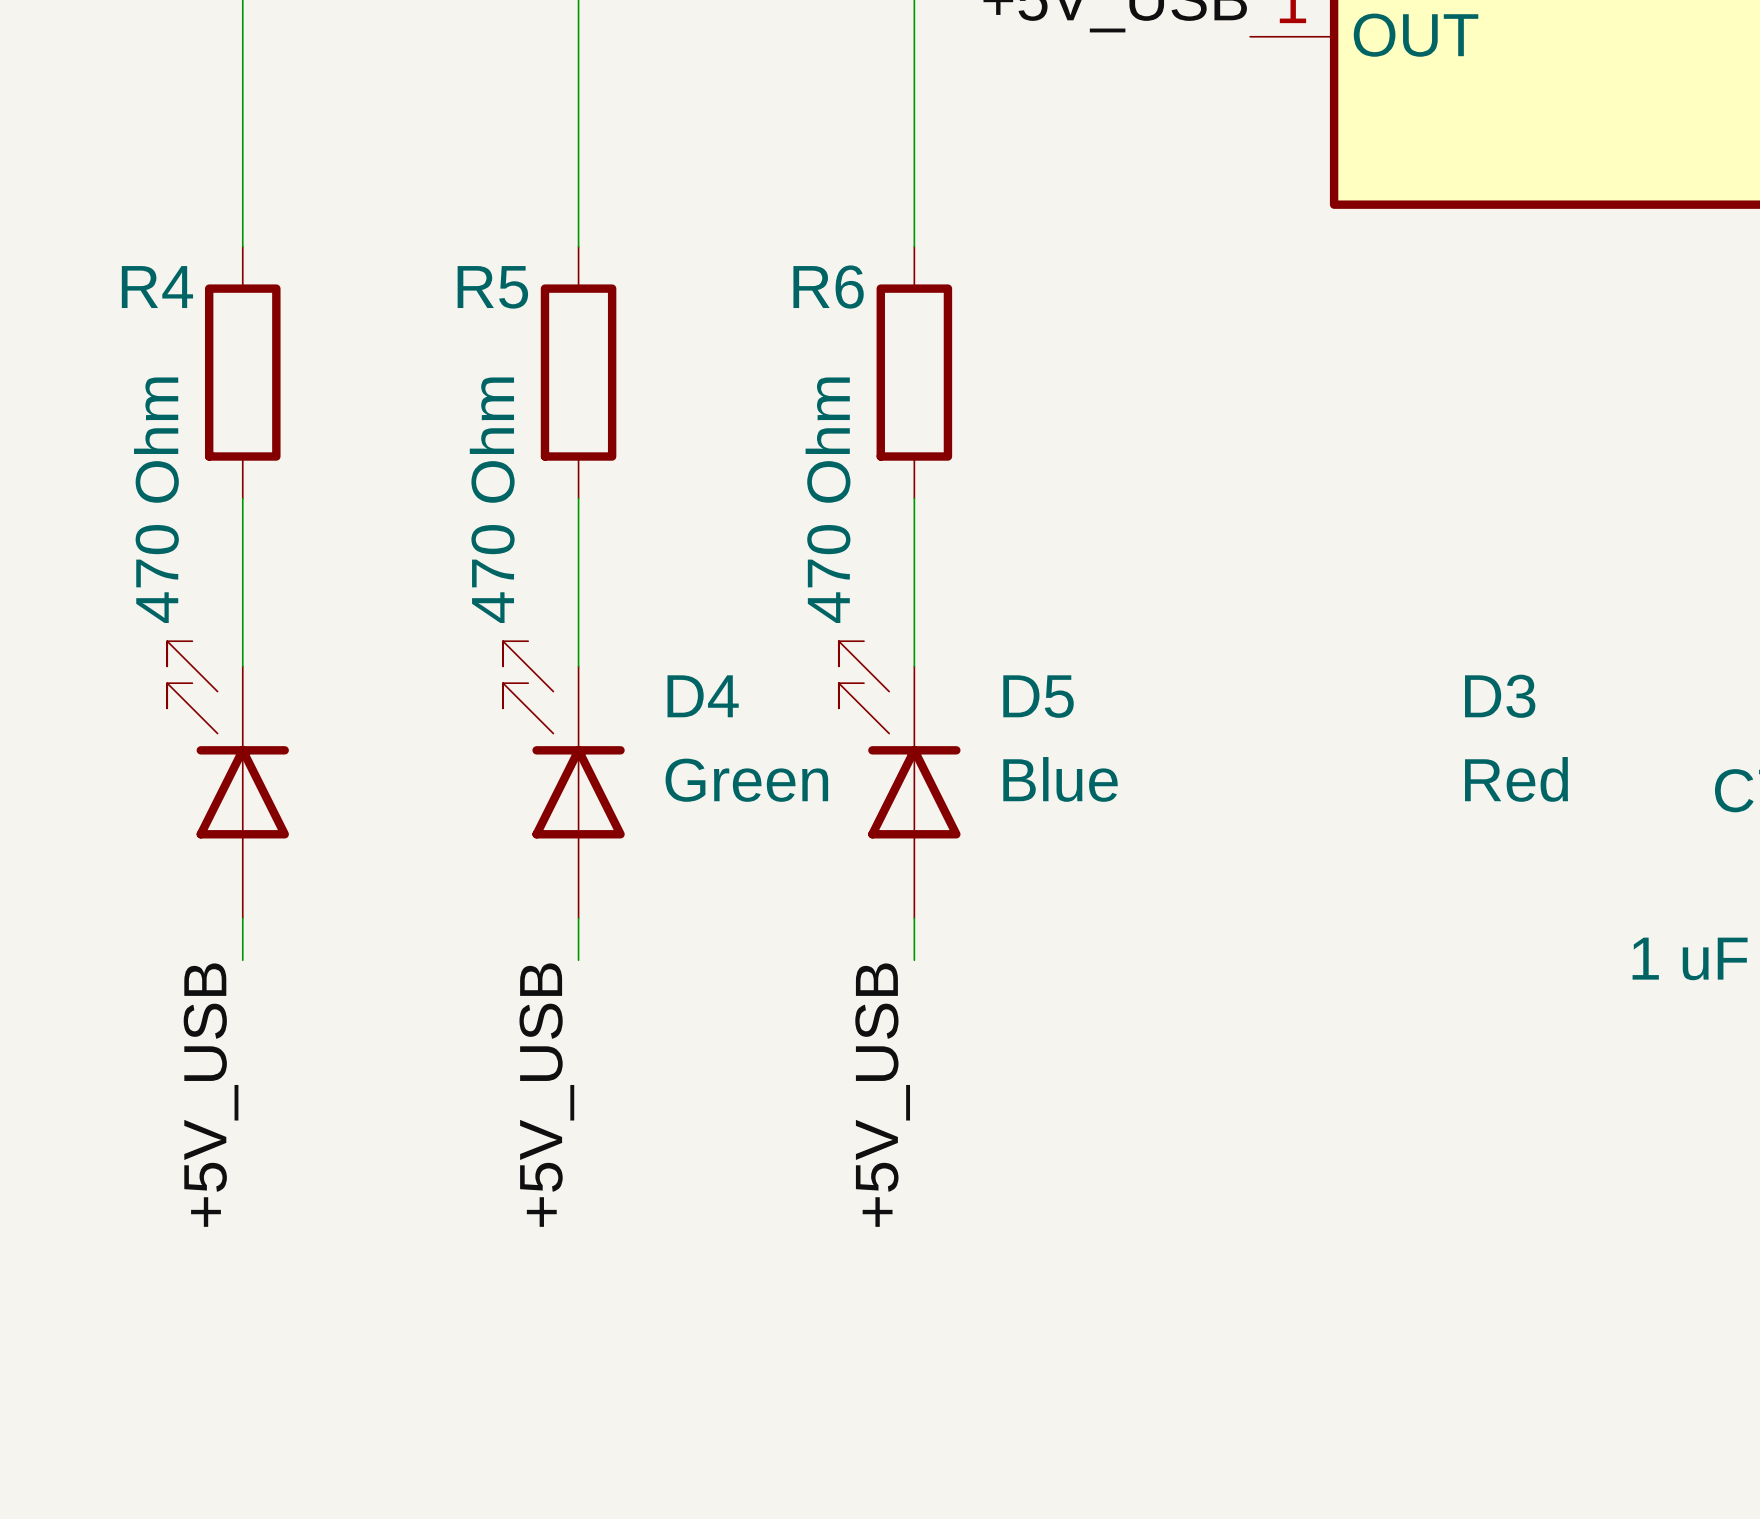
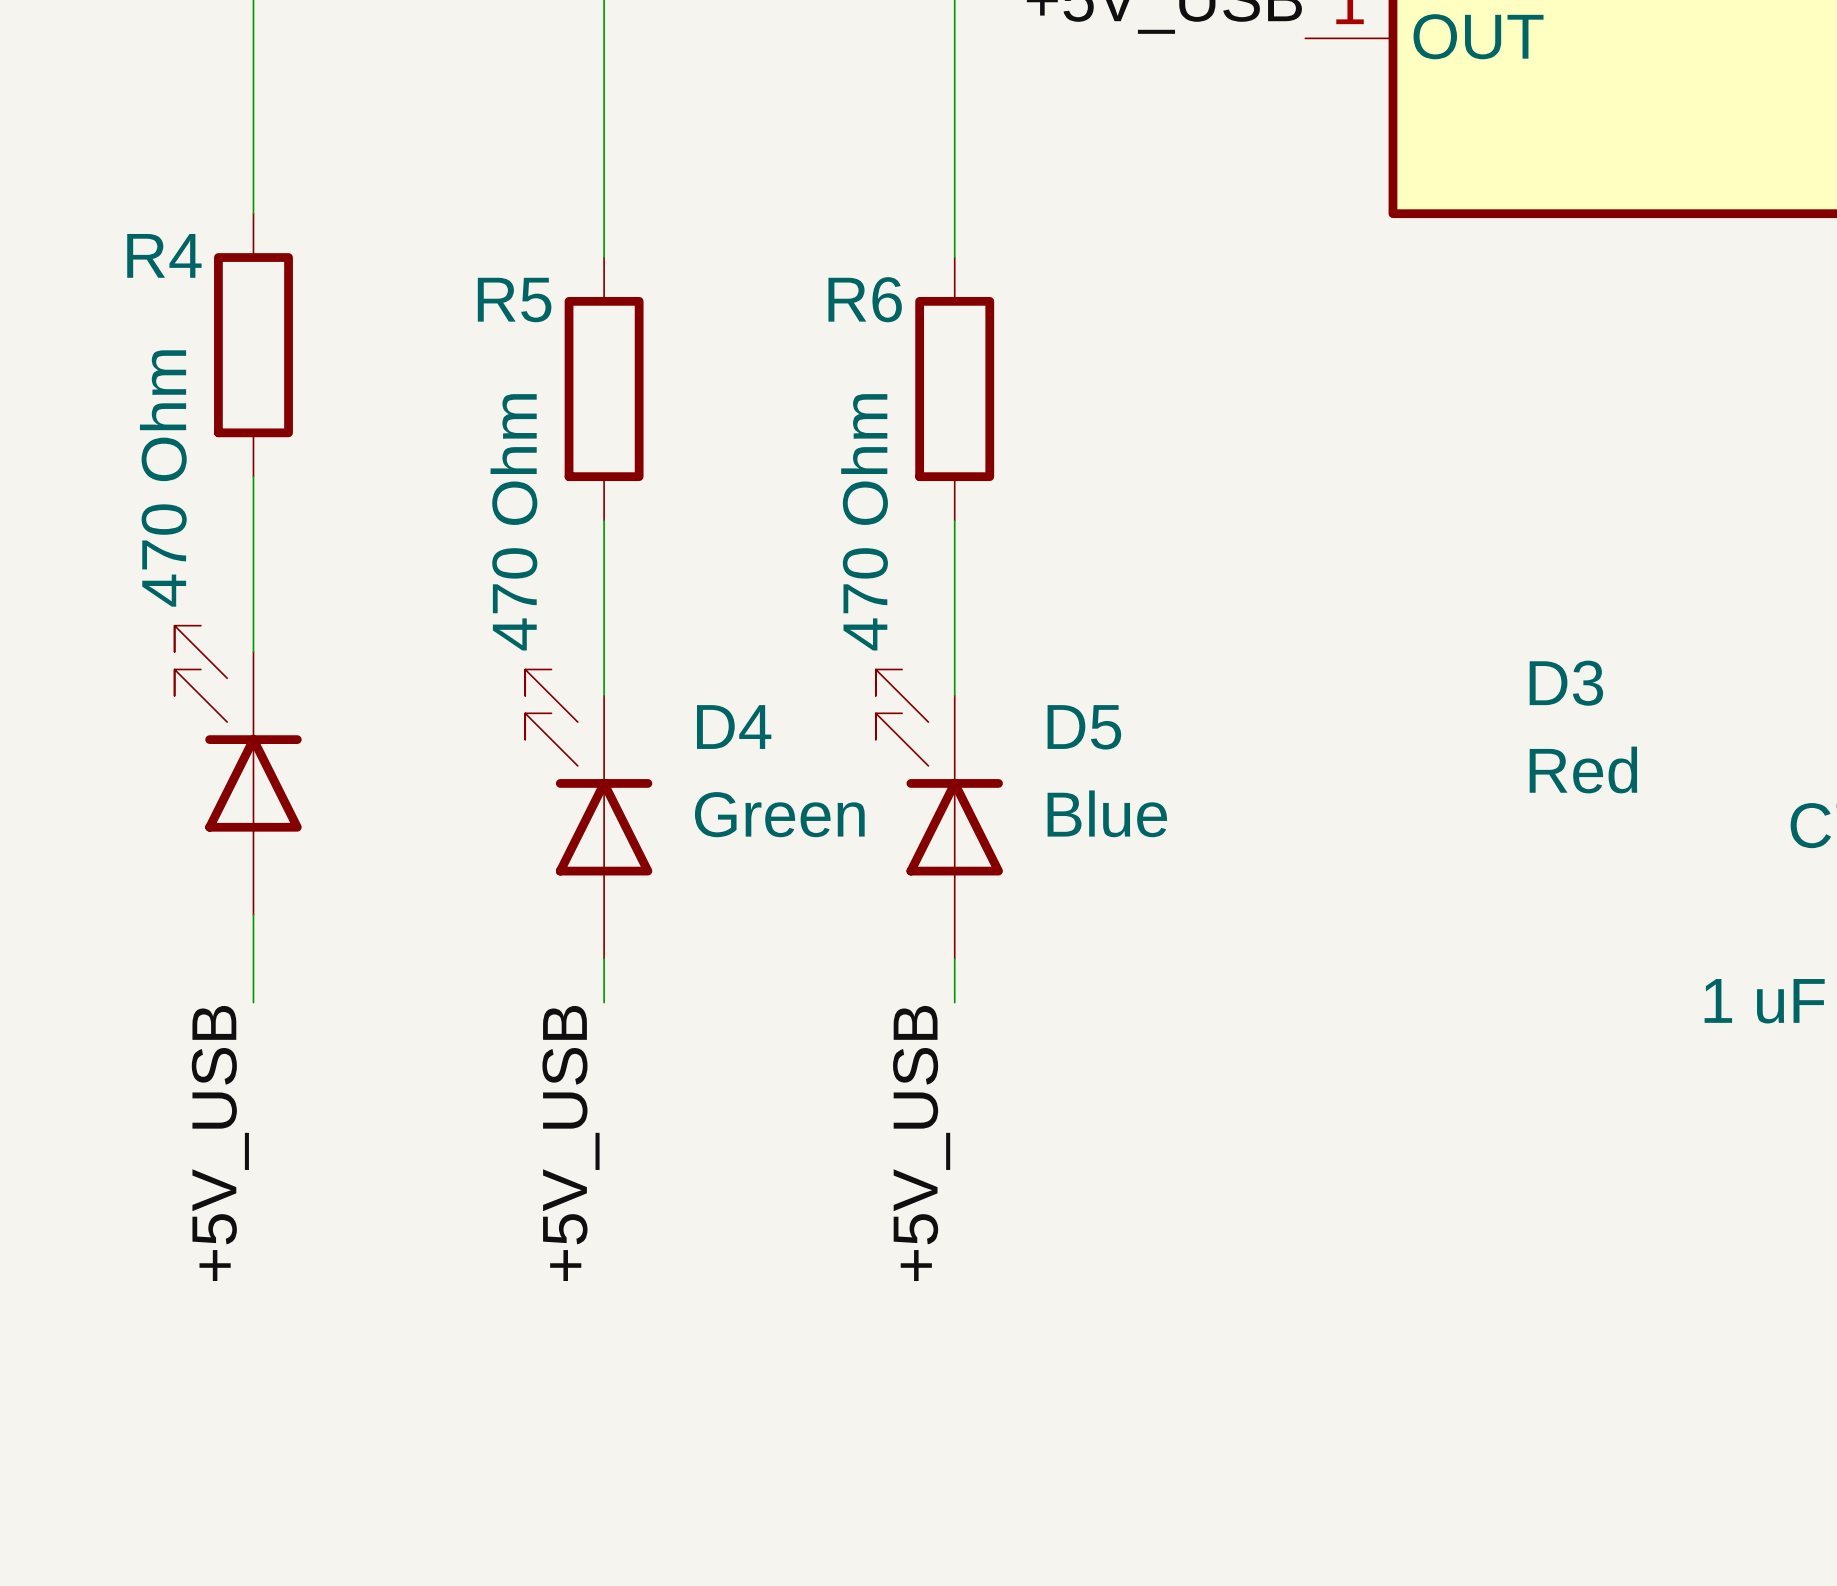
R4 position: (242, 372) -> (253, 345)
D3 position: (228, 779) -> (238, 770)

